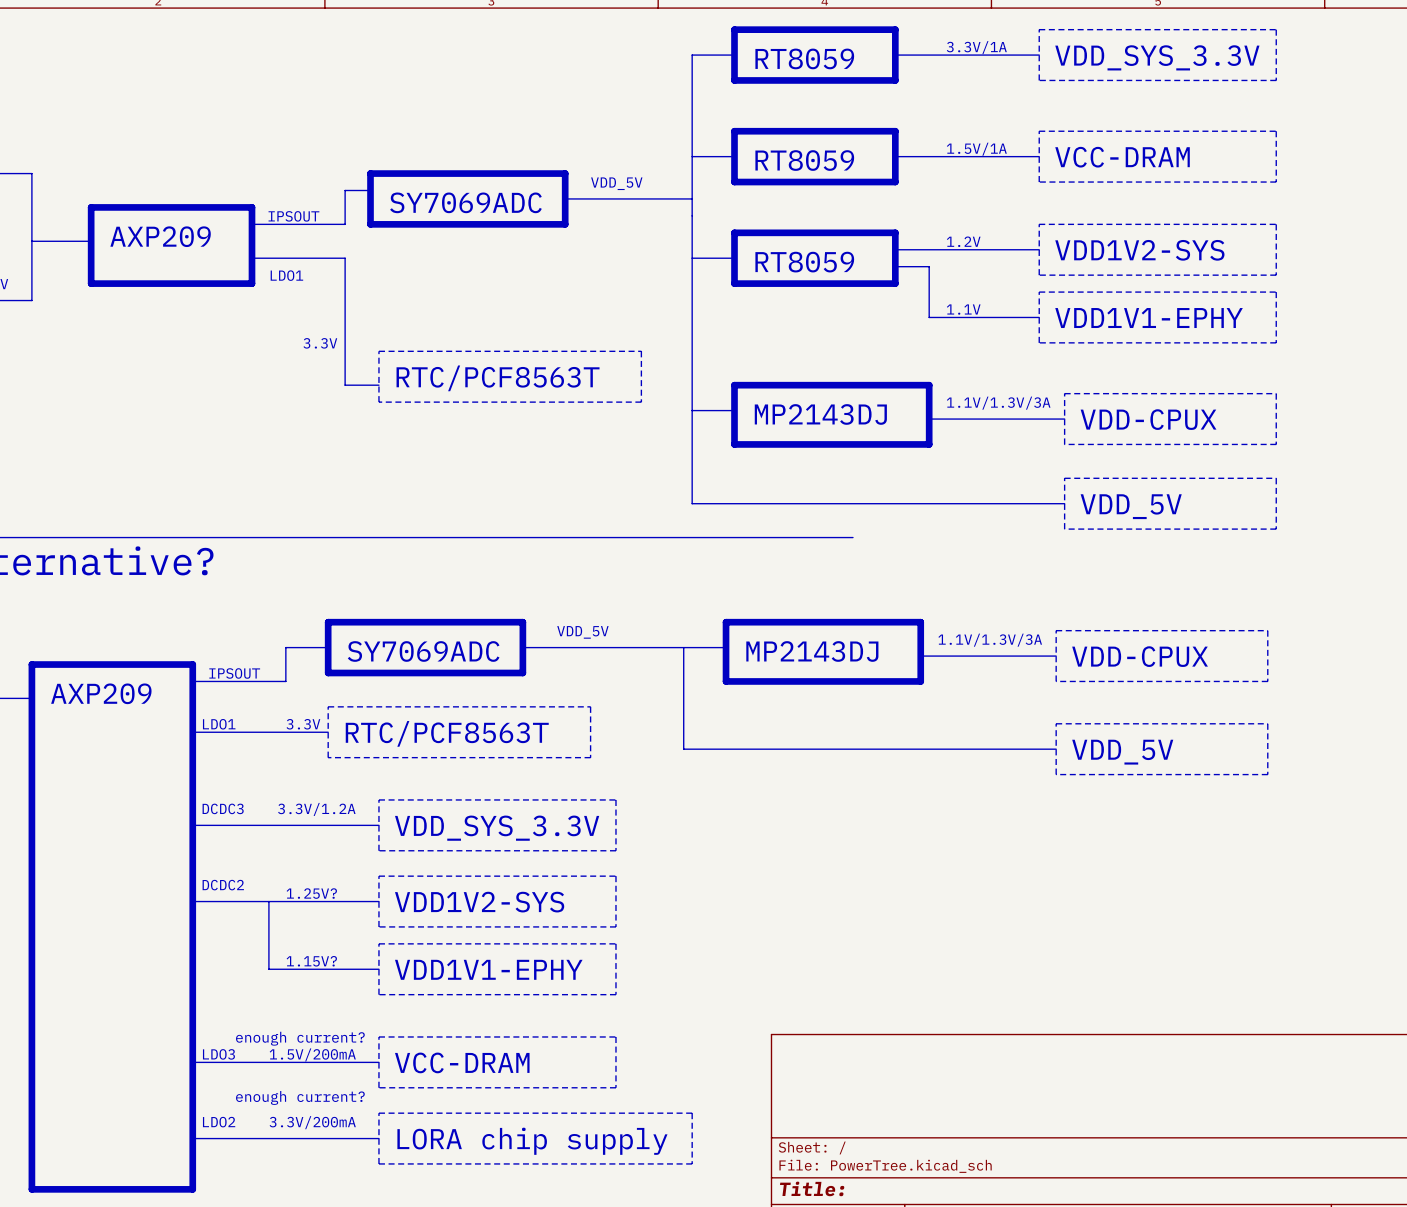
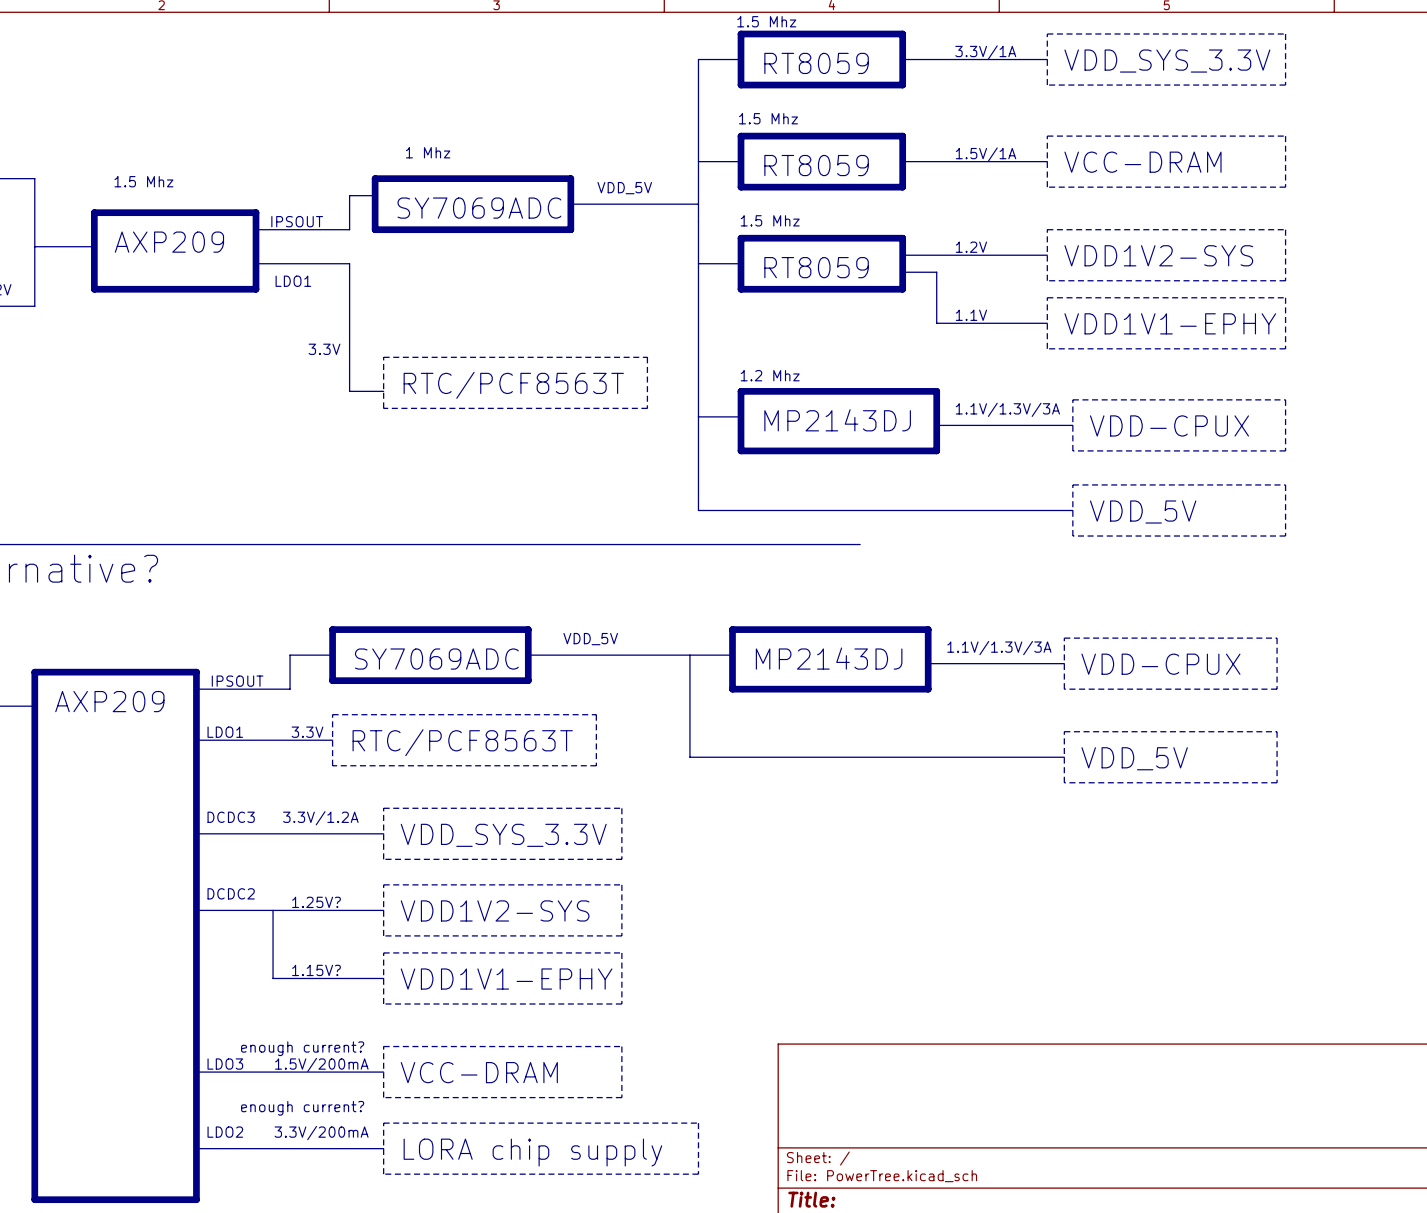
text: none -> 1.5 Mhz (766, 21)
text: none -> 1.5 Mhz (768, 118)
text: none -> 1 Mhz (428, 152)
text: none -> 1.5 Mhz (143, 181)
text: none -> 1.5 Mhz (770, 220)
text: none -> 1.2 Mhz (770, 375)

